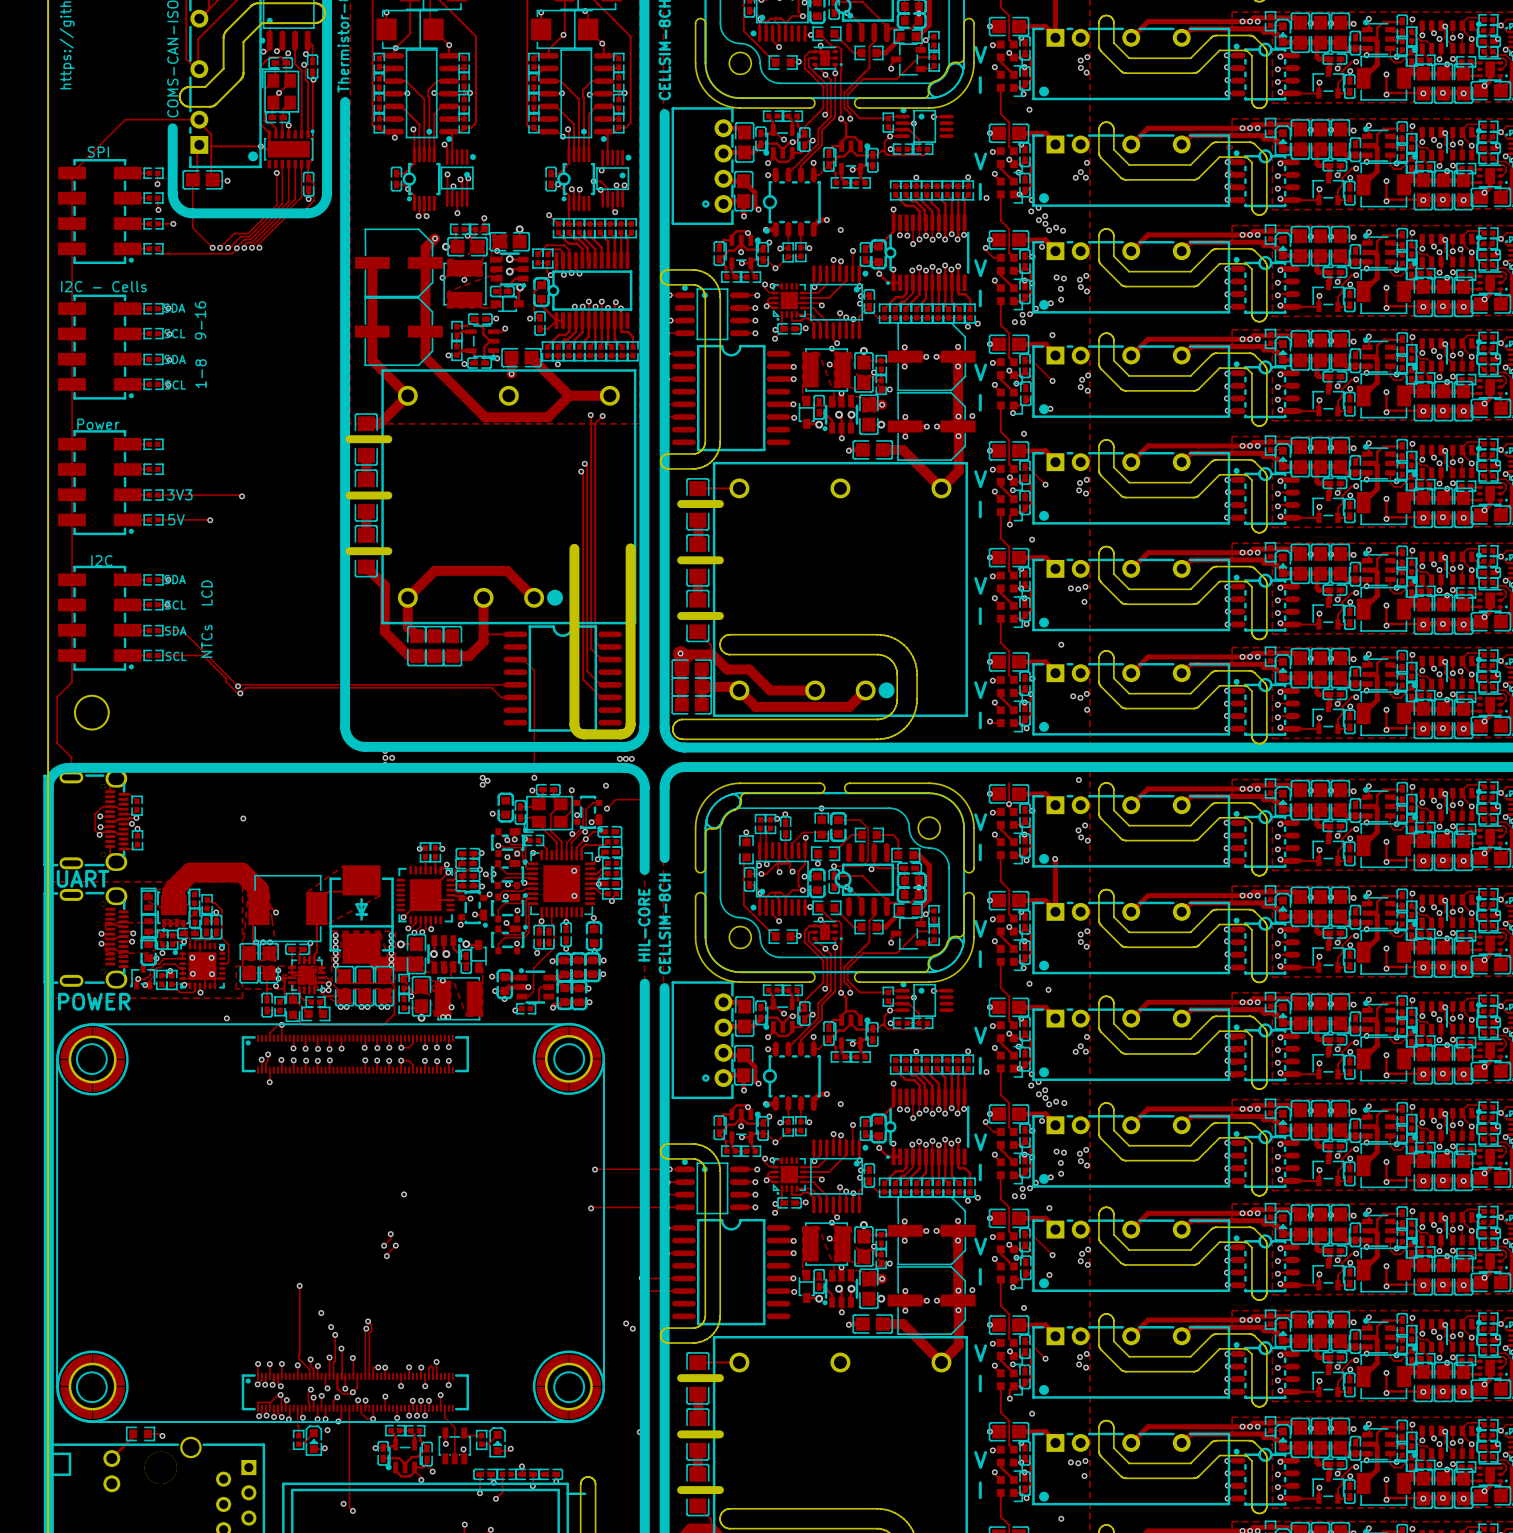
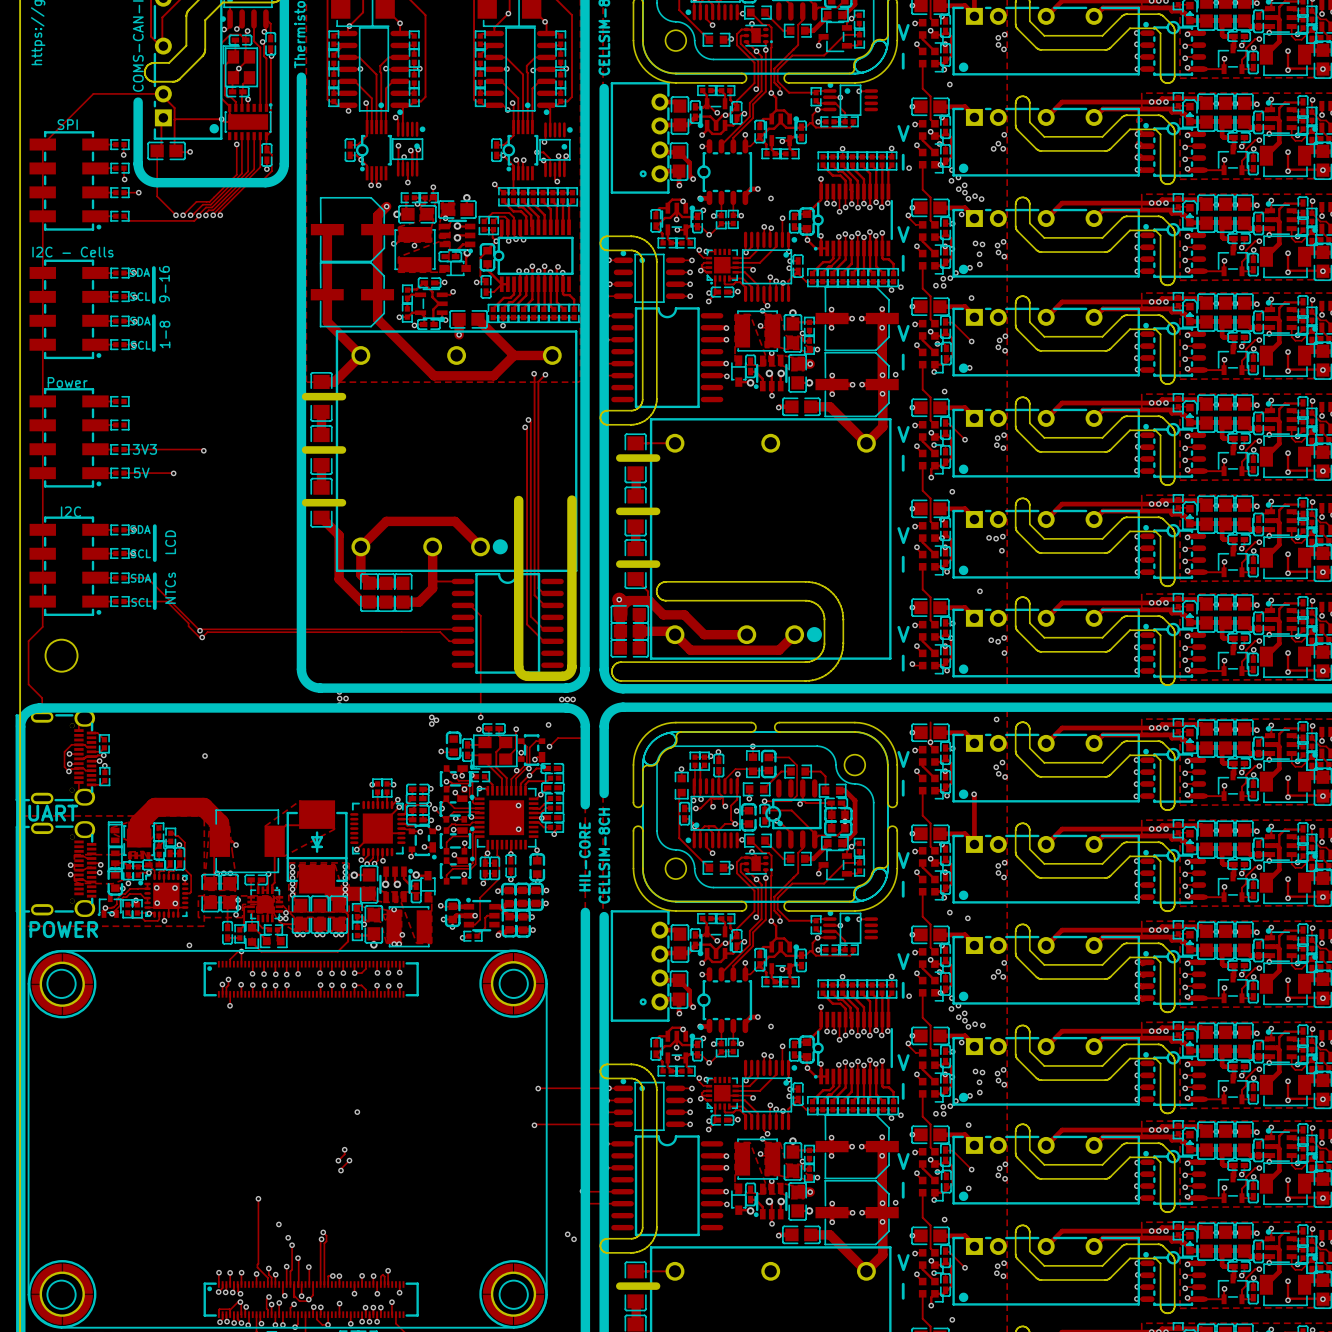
line: none -> (153, 268) (153, 301)
line: none -> (153, 316) (153, 349)
line: none -> (154, 526) (154, 560)
line: none -> (154, 574) (154, 608)

